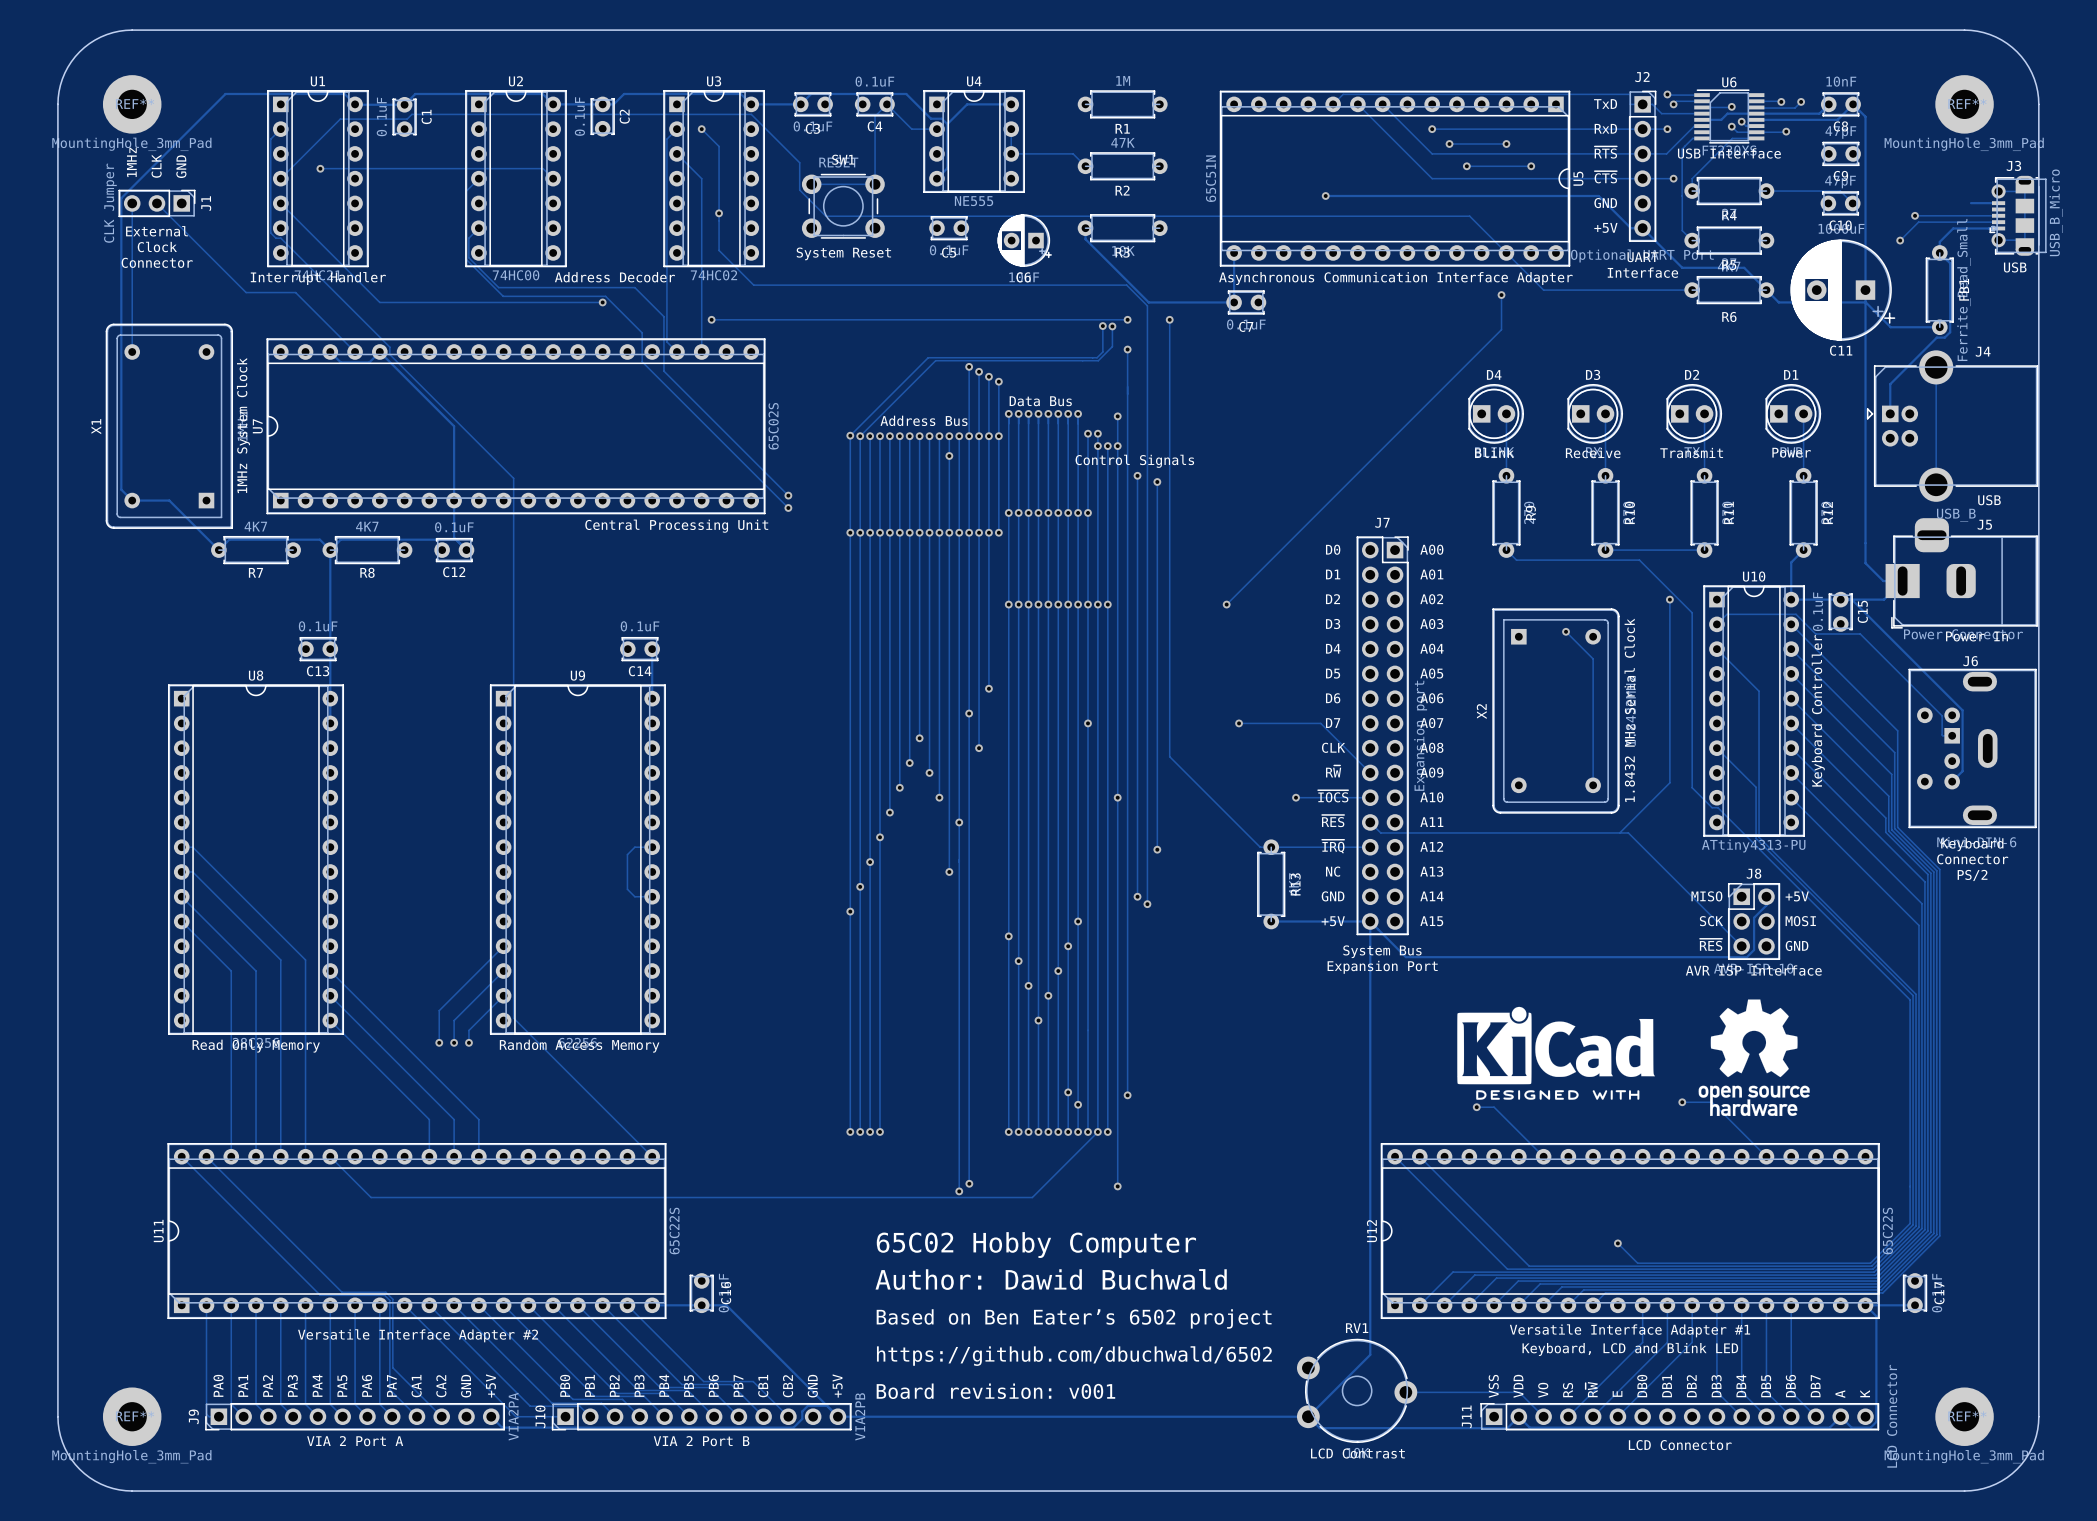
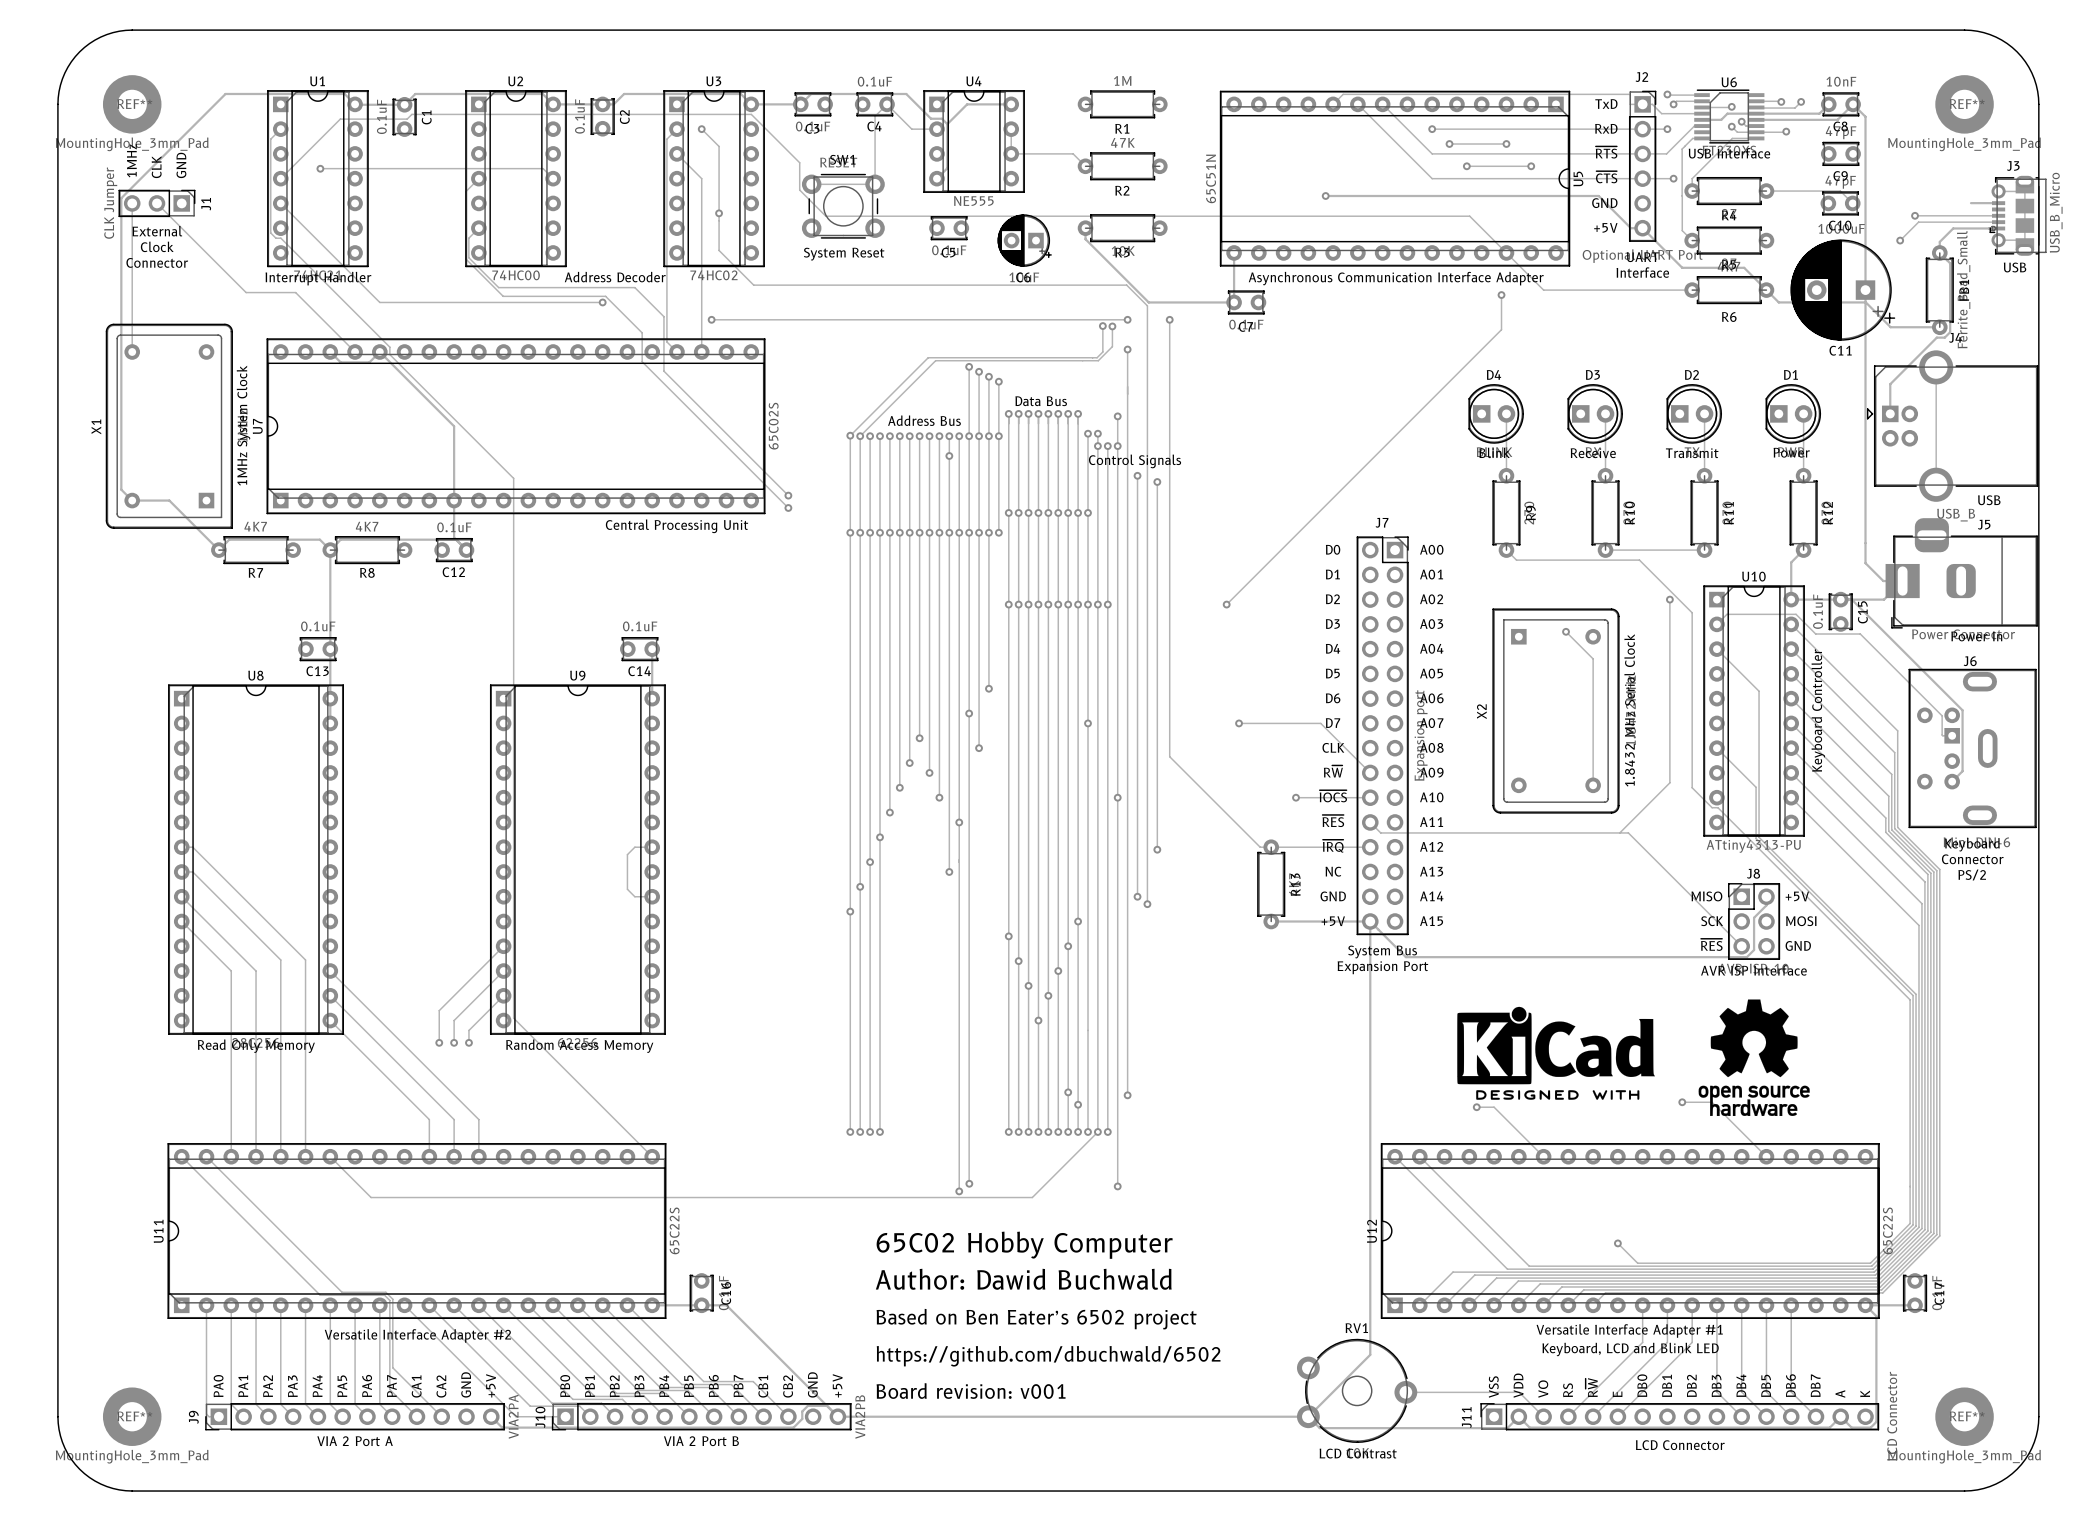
J4 name position: J4 (1983, 351) -> J4 (1955, 337)

